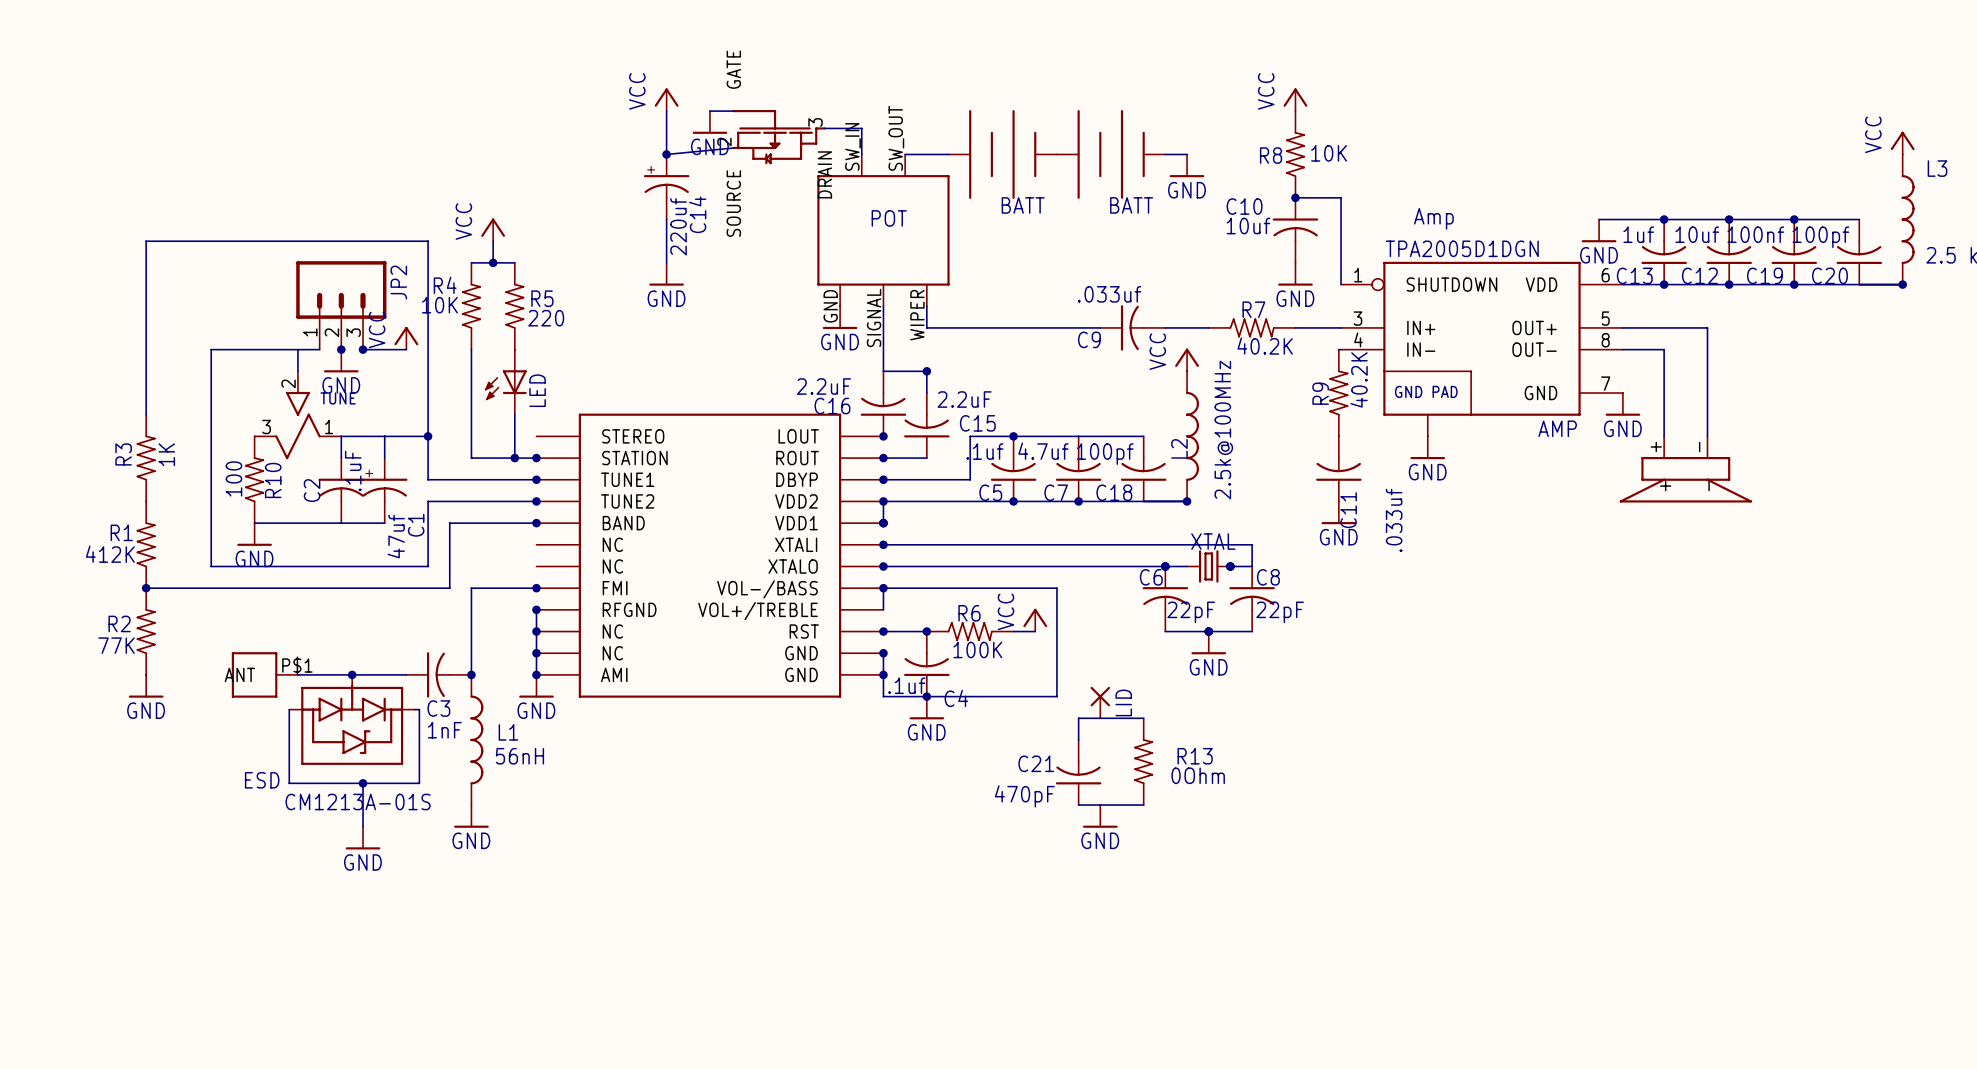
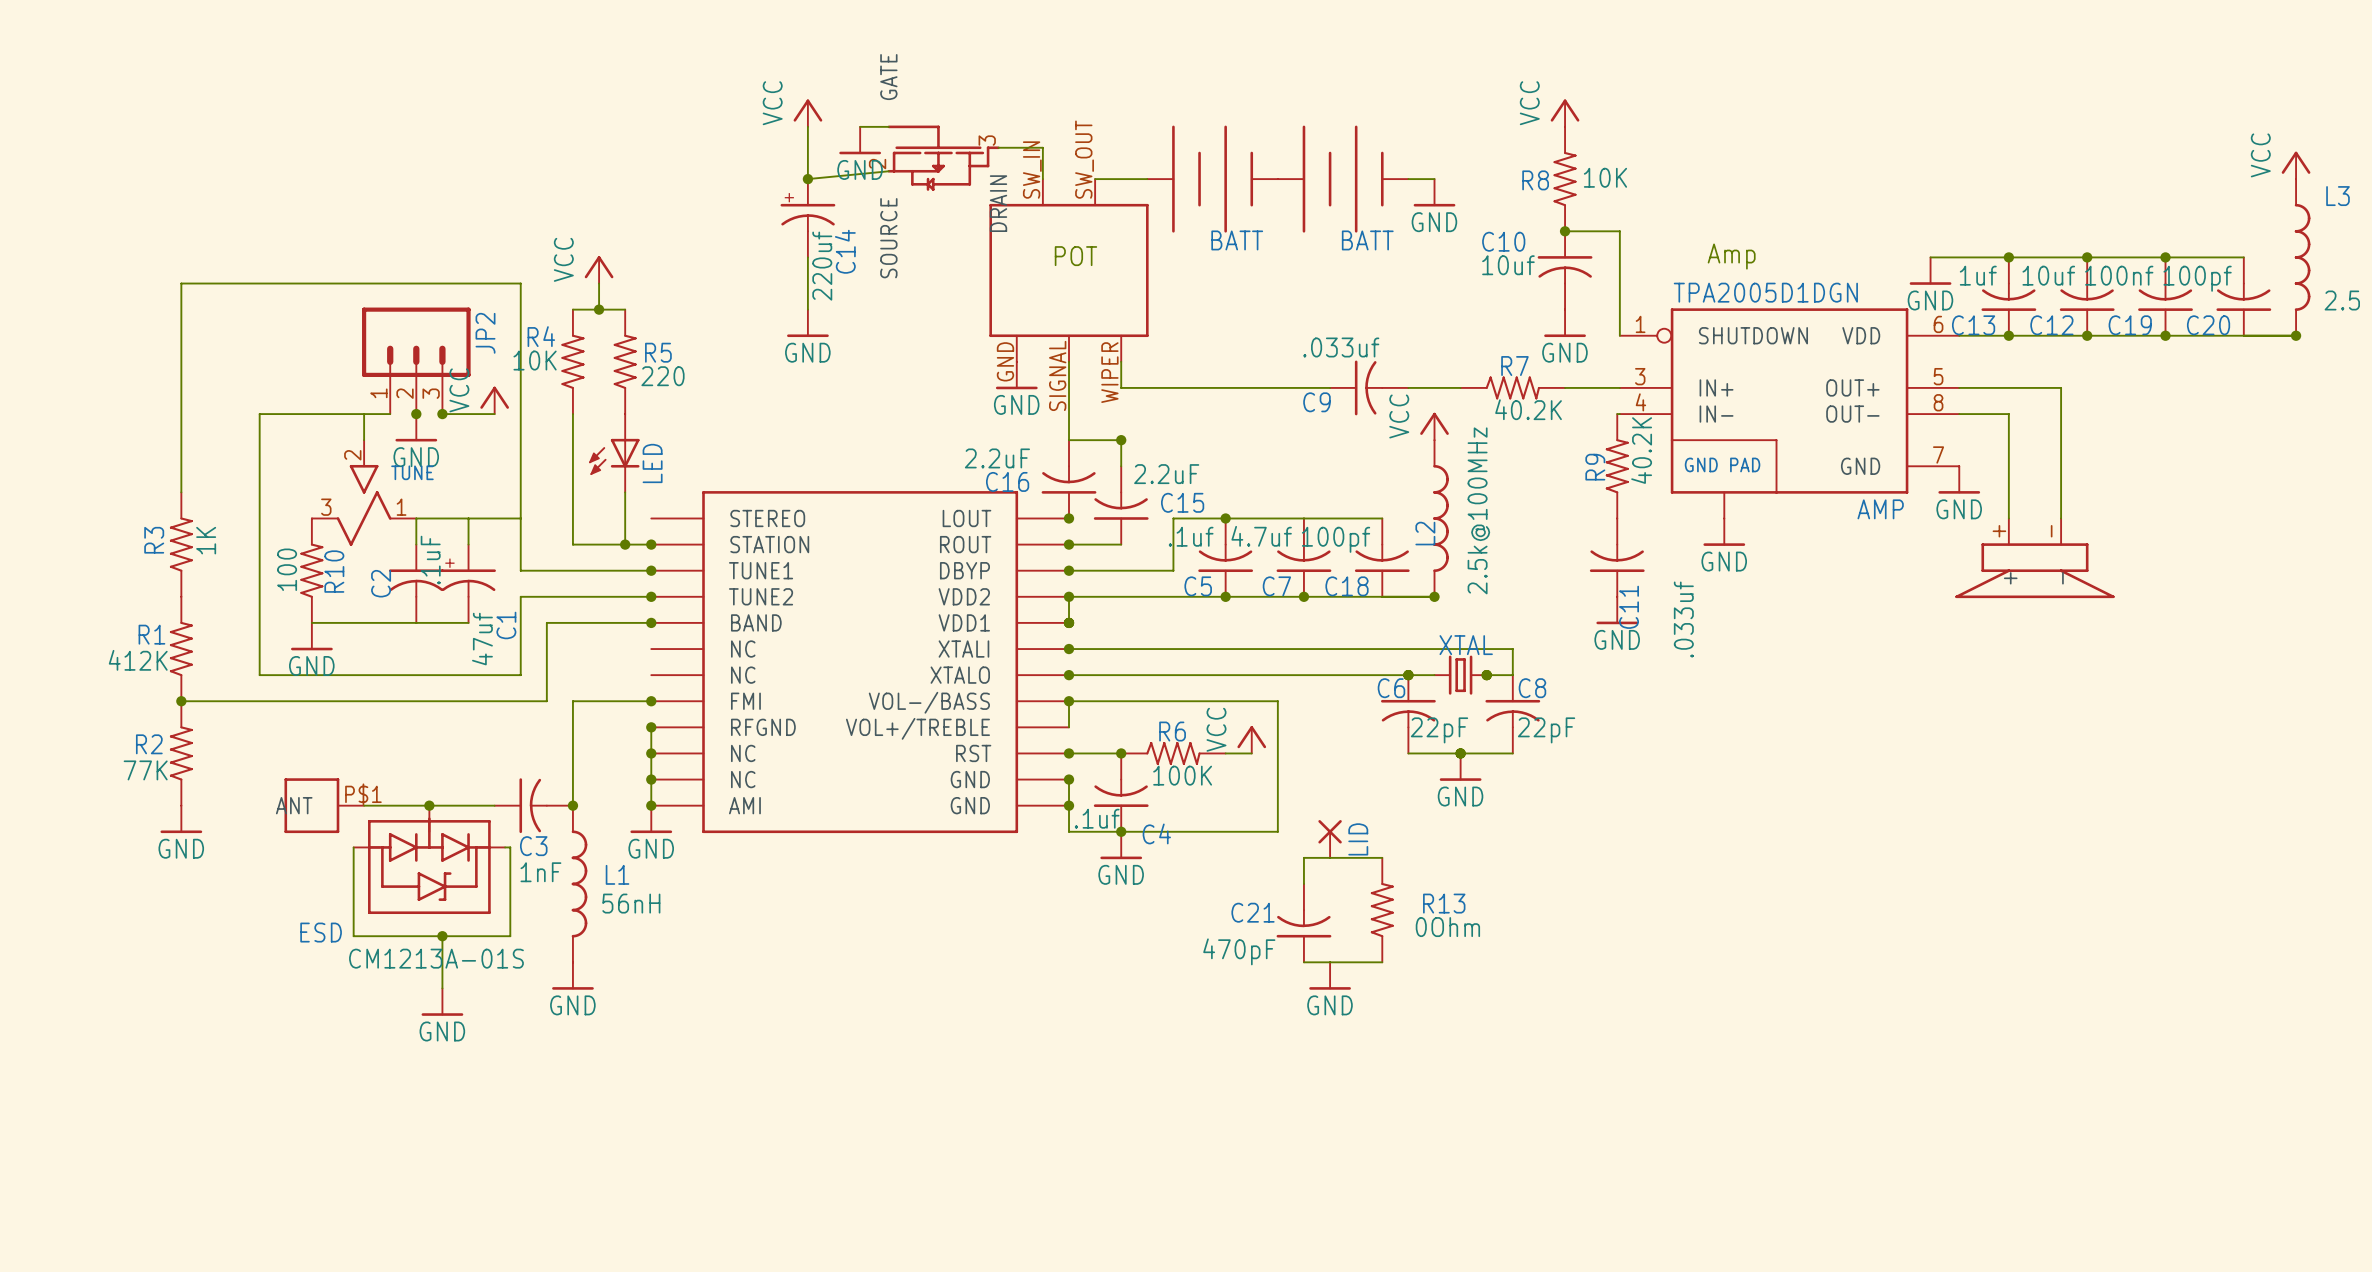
junction: (428, 436) -> none

